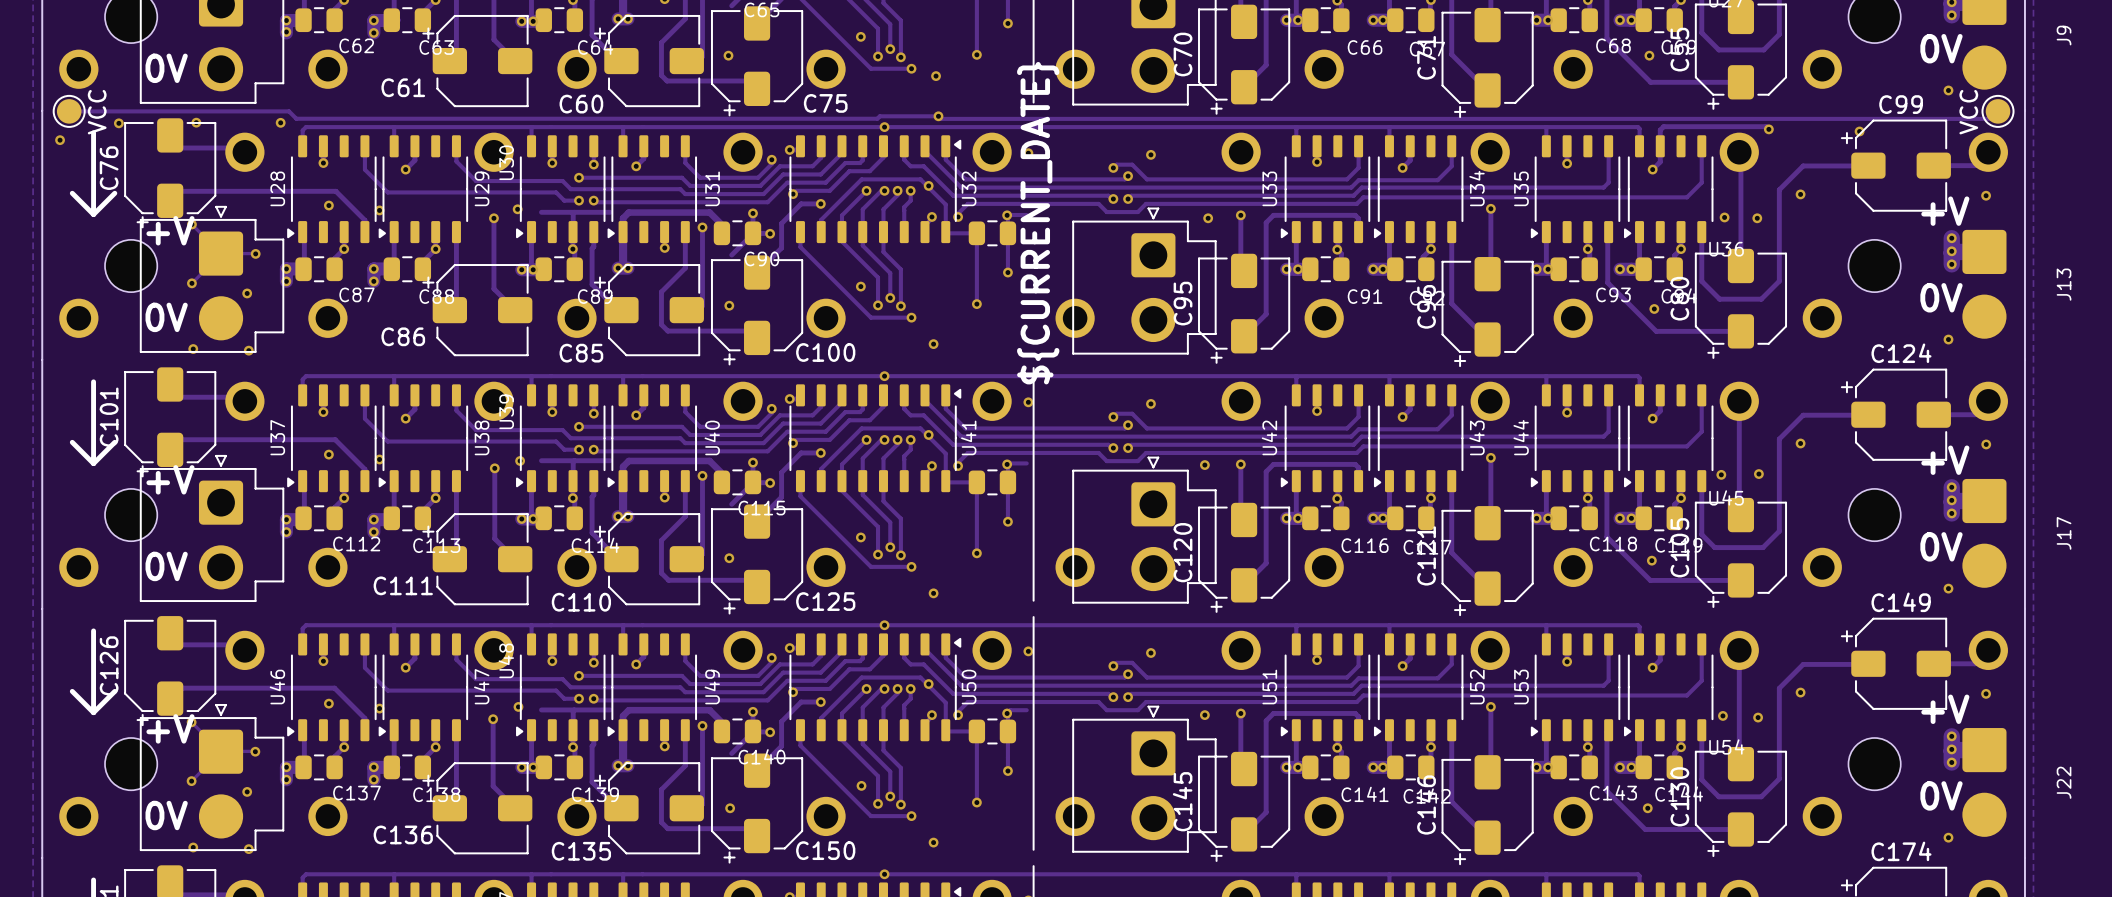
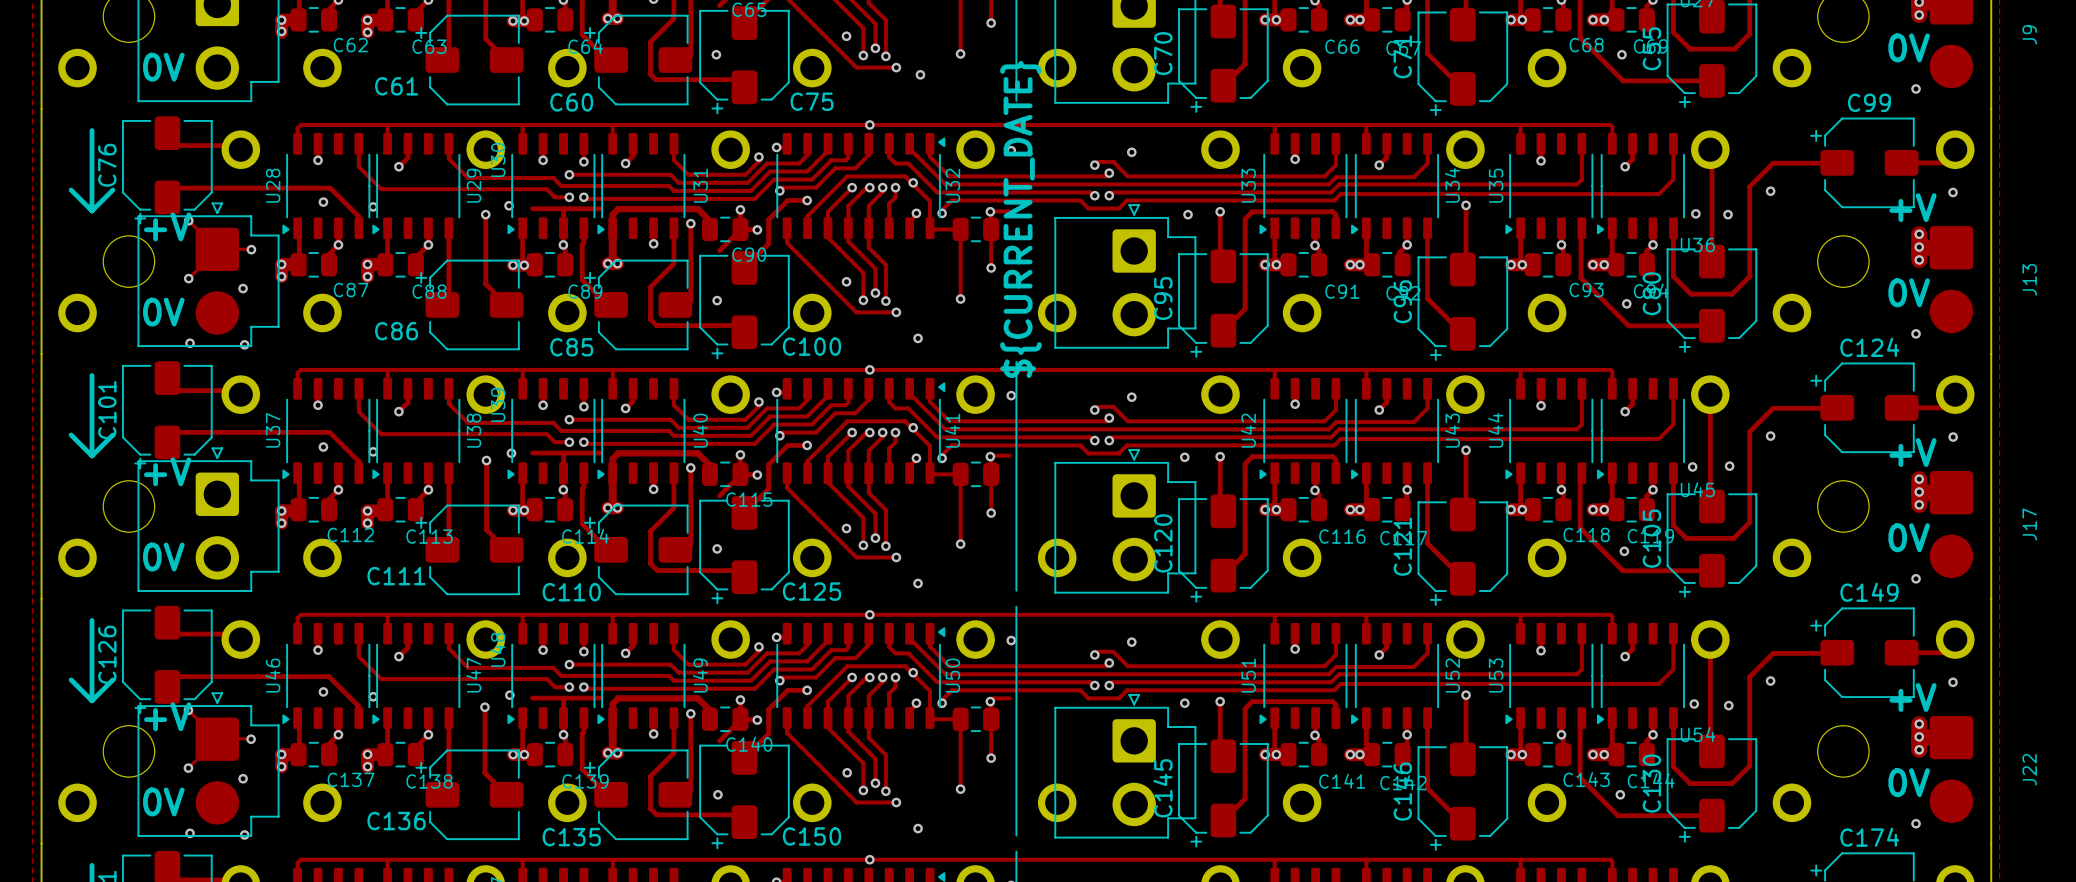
track: (69, 111) (289, 111) (296, 118) (877, 118) (879, 116) (938, 116) (941, 118) (1993, 118) (1998, 114) (1998, 111) -> none
part: VCC (69, 111) -> none
part: VCC (1998, 111) -> none
via: (938, 116) -> none
via: (196, 122) -> none
via: (280, 122) -> none
via: (118, 123) -> none
track: (1768, 129) (1766, 126) (1663, 126) (1660, 130) (1660, 146) -> none
via: (1768, 129) -> none
via: (1859, 131) -> none
via: (60, 140) -> none

